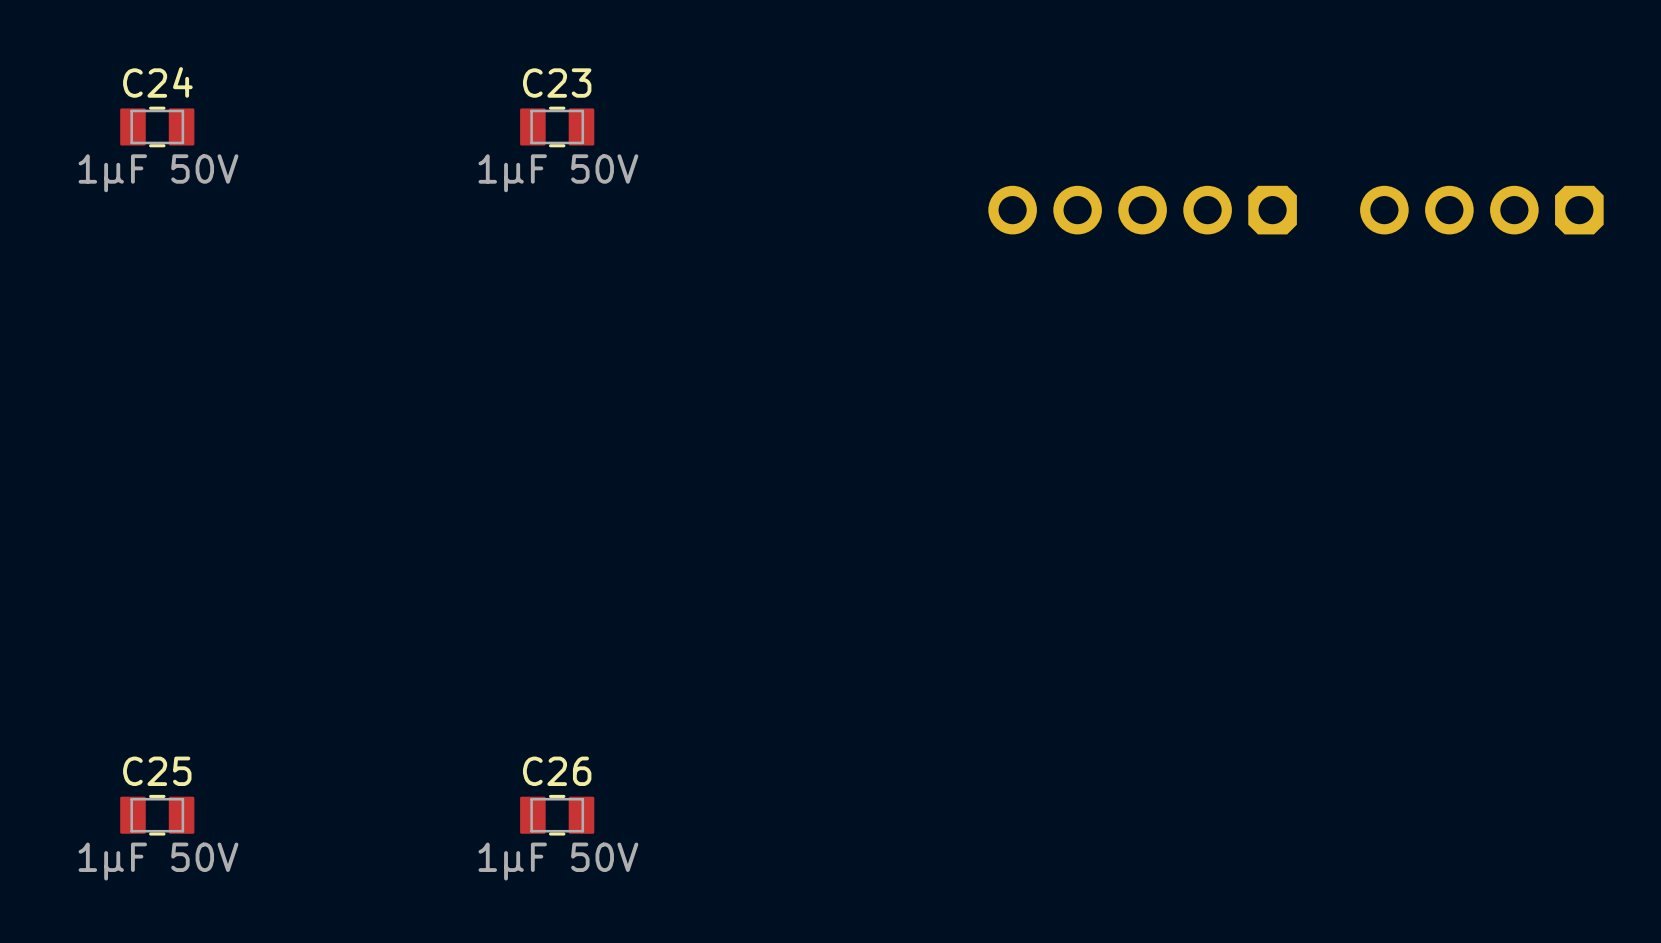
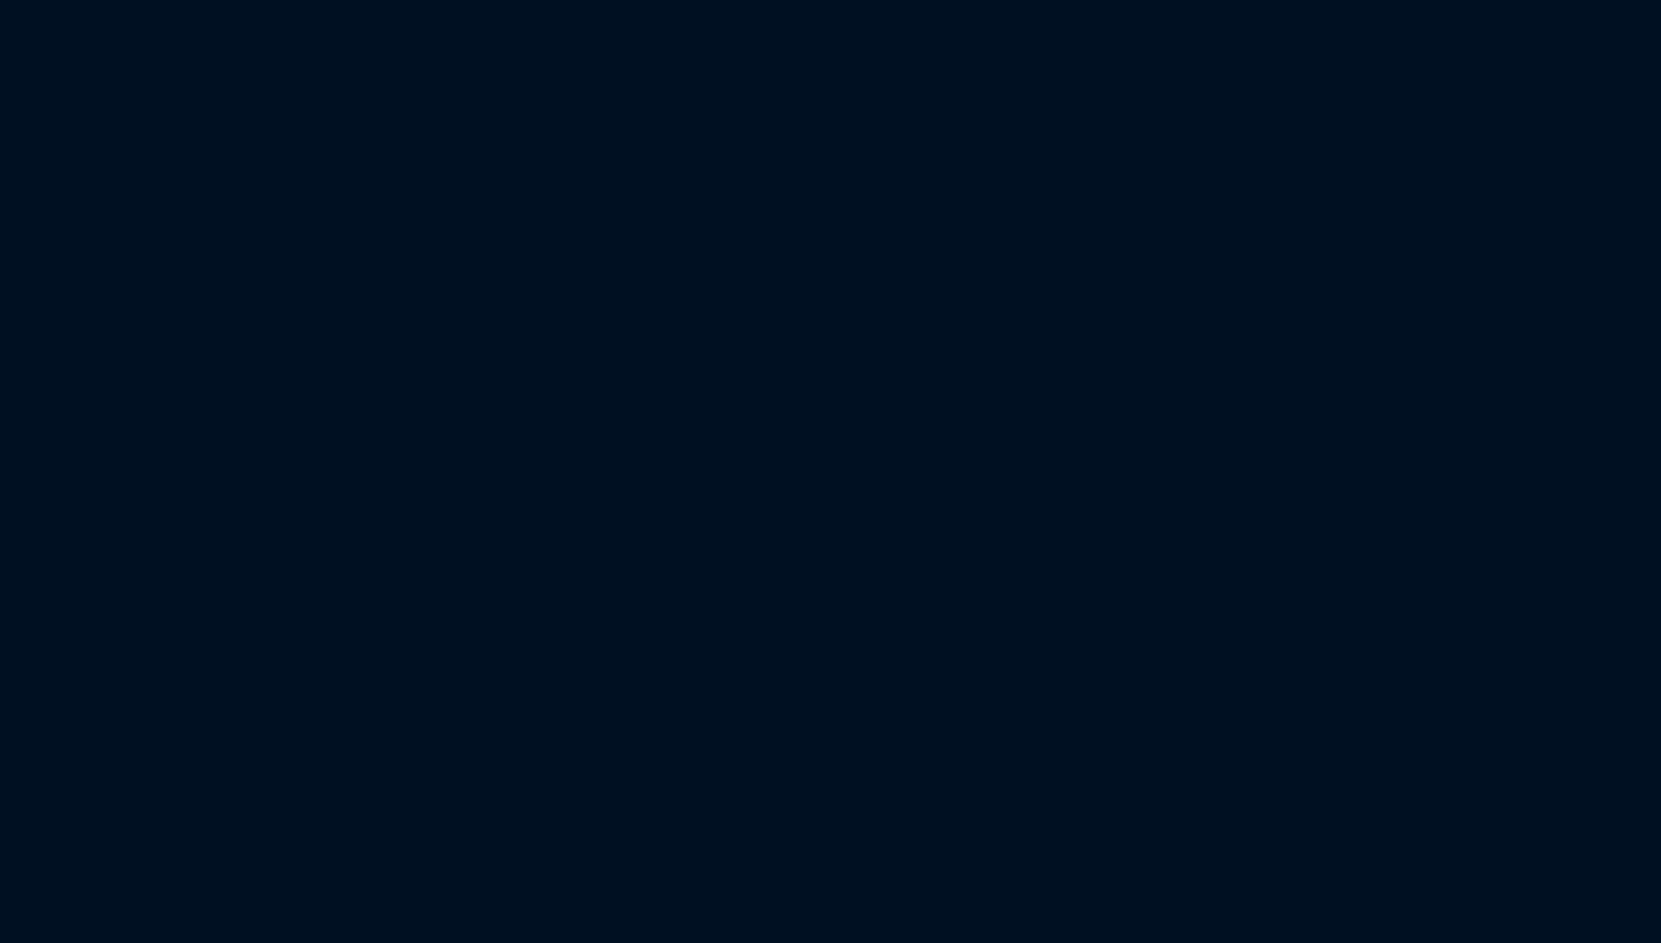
C24: 1µF 50V (157, 126) -> none
C23: 1µF 50V (557, 126) -> none
part: (1142, 210) -> none
part: (1481, 210) -> none
C25: 1µF 50V (157, 815) -> none
C26: 1µF 50V (557, 815) -> none

